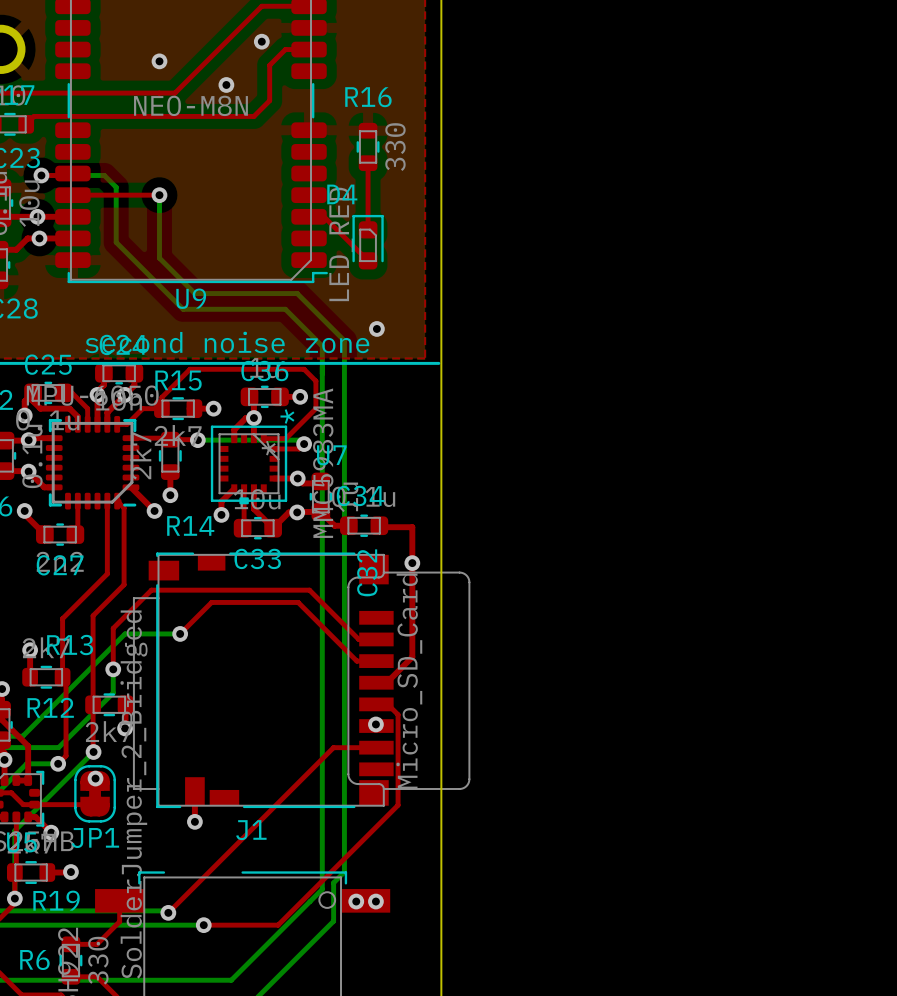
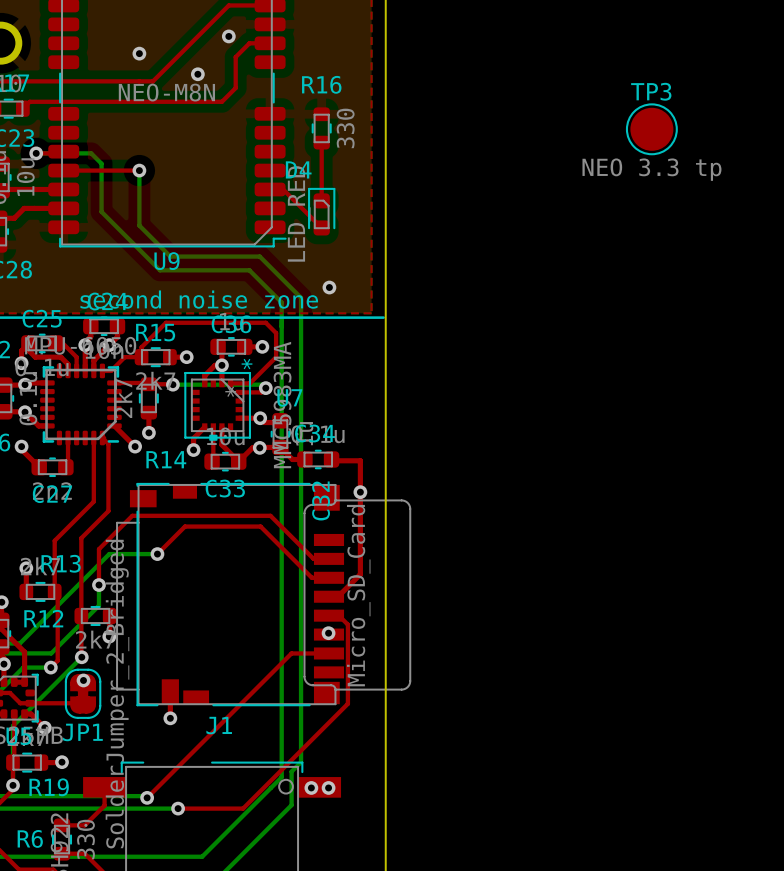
TP3: none -> NEO 3.3 tp (651, 129)
via: (37, 216) -> none
via: (39, 238) -> none

